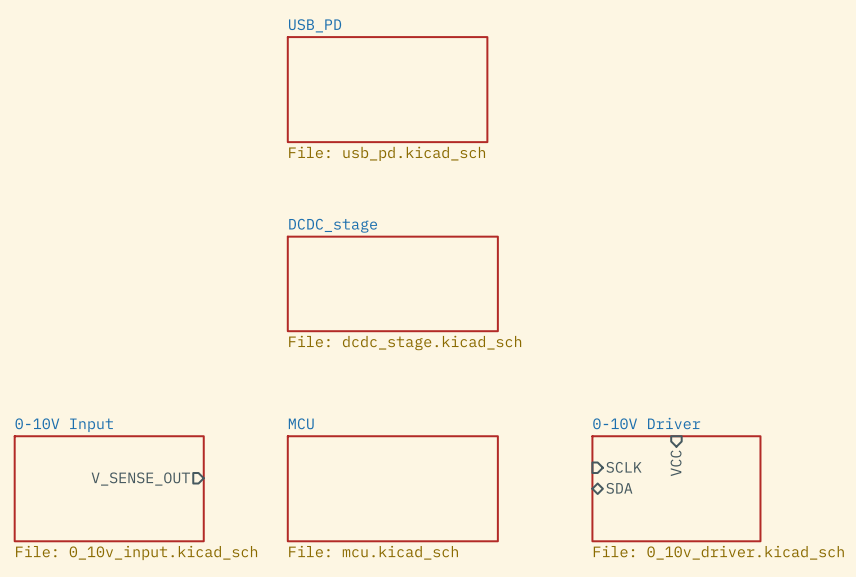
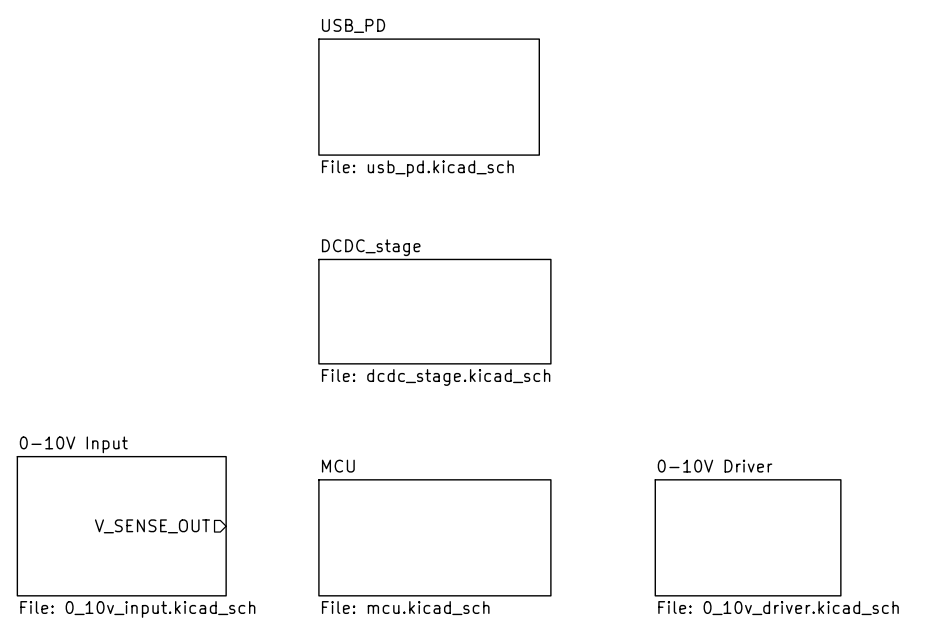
sheet 0-10V Input shape: [14, 435, 205, 542] -> [16, 455, 227, 597]
sheet pin: VCC (676, 463) -> none
sheet pin: SCLK (623, 467) -> none
sheet pin: SDA (619, 488) -> none

